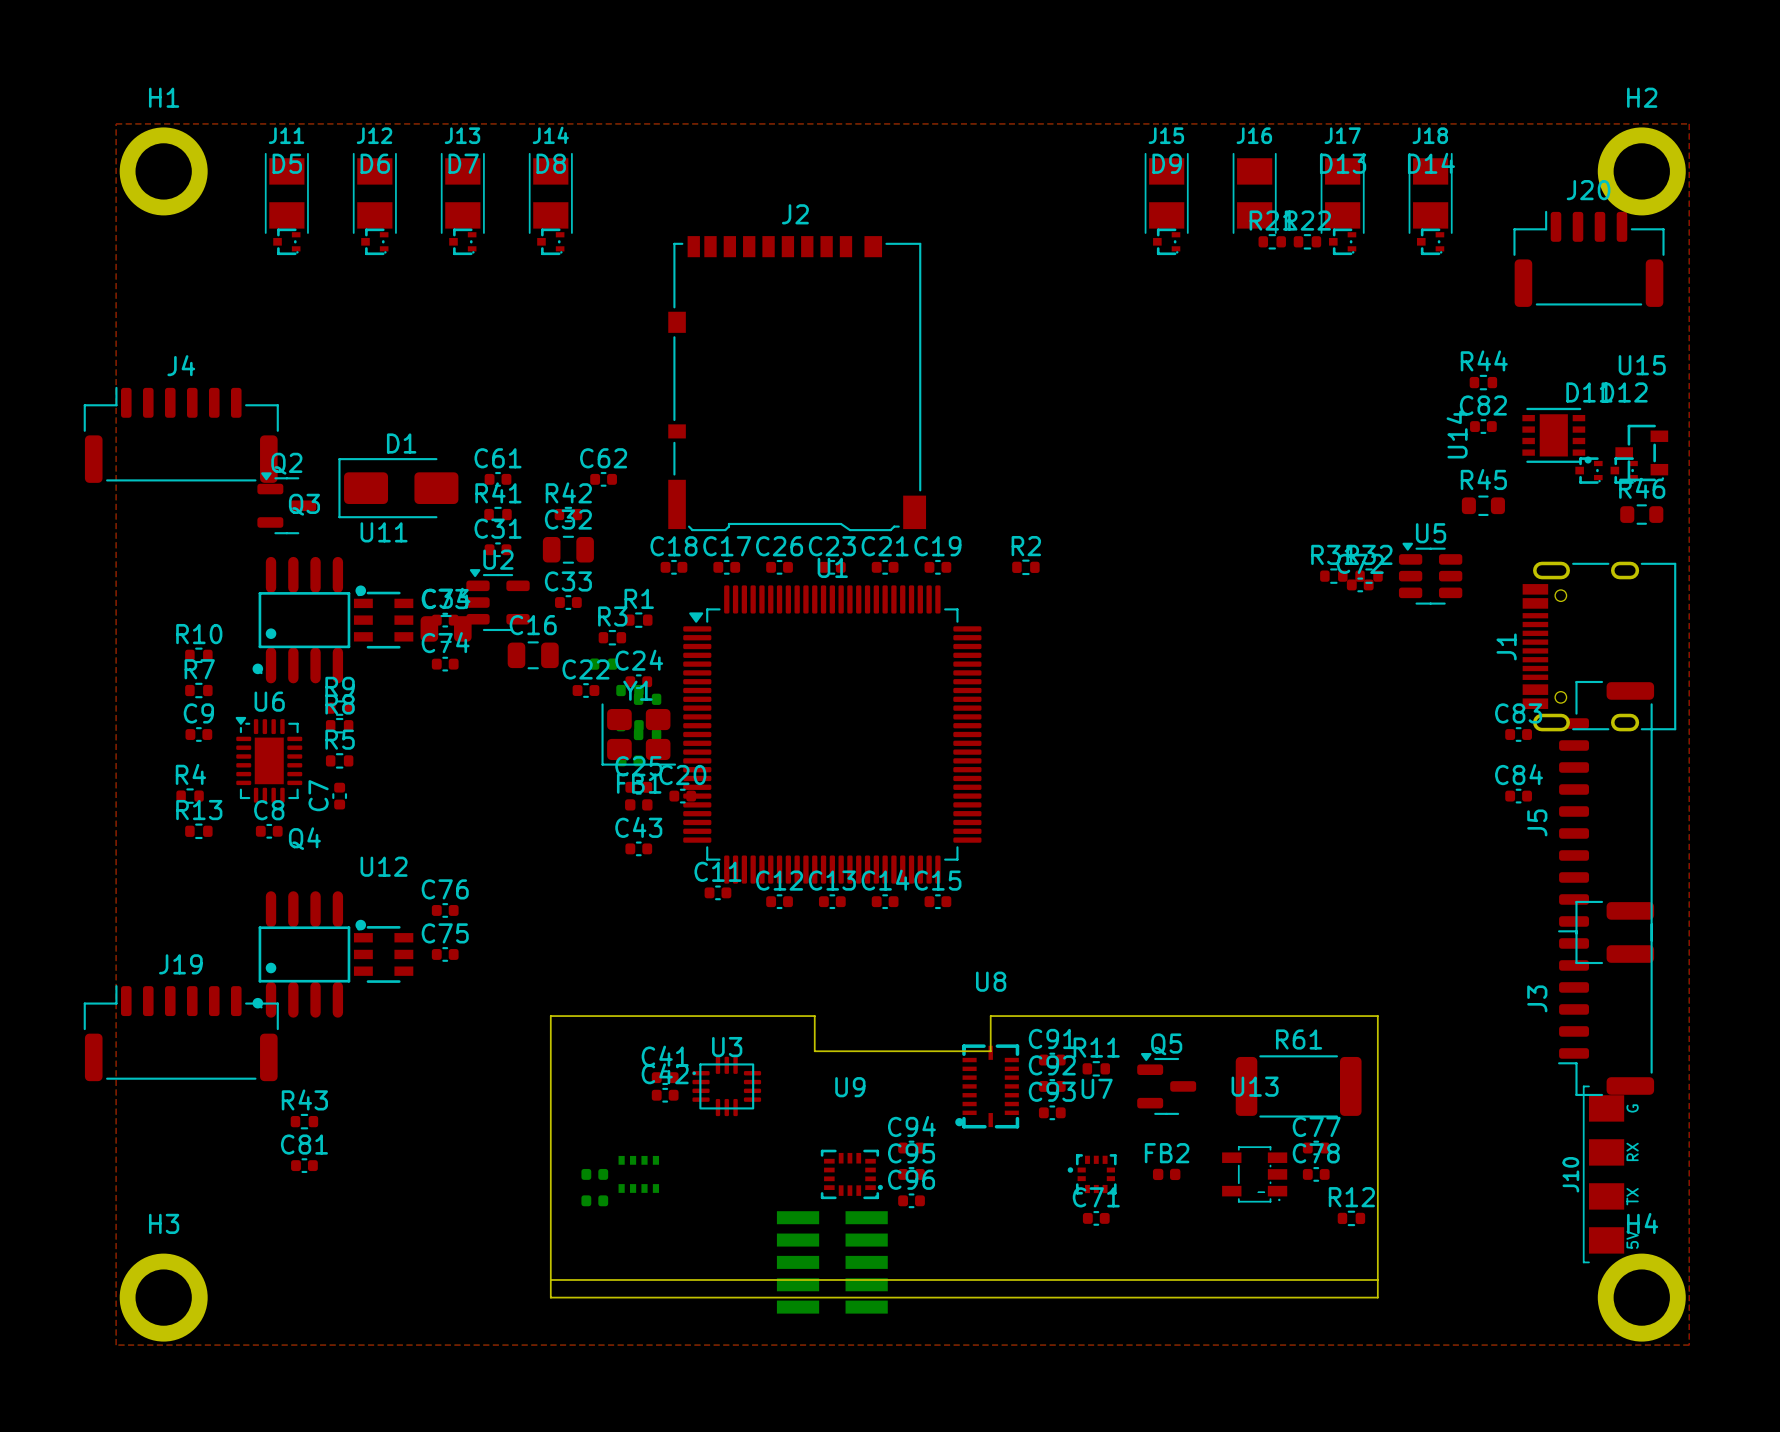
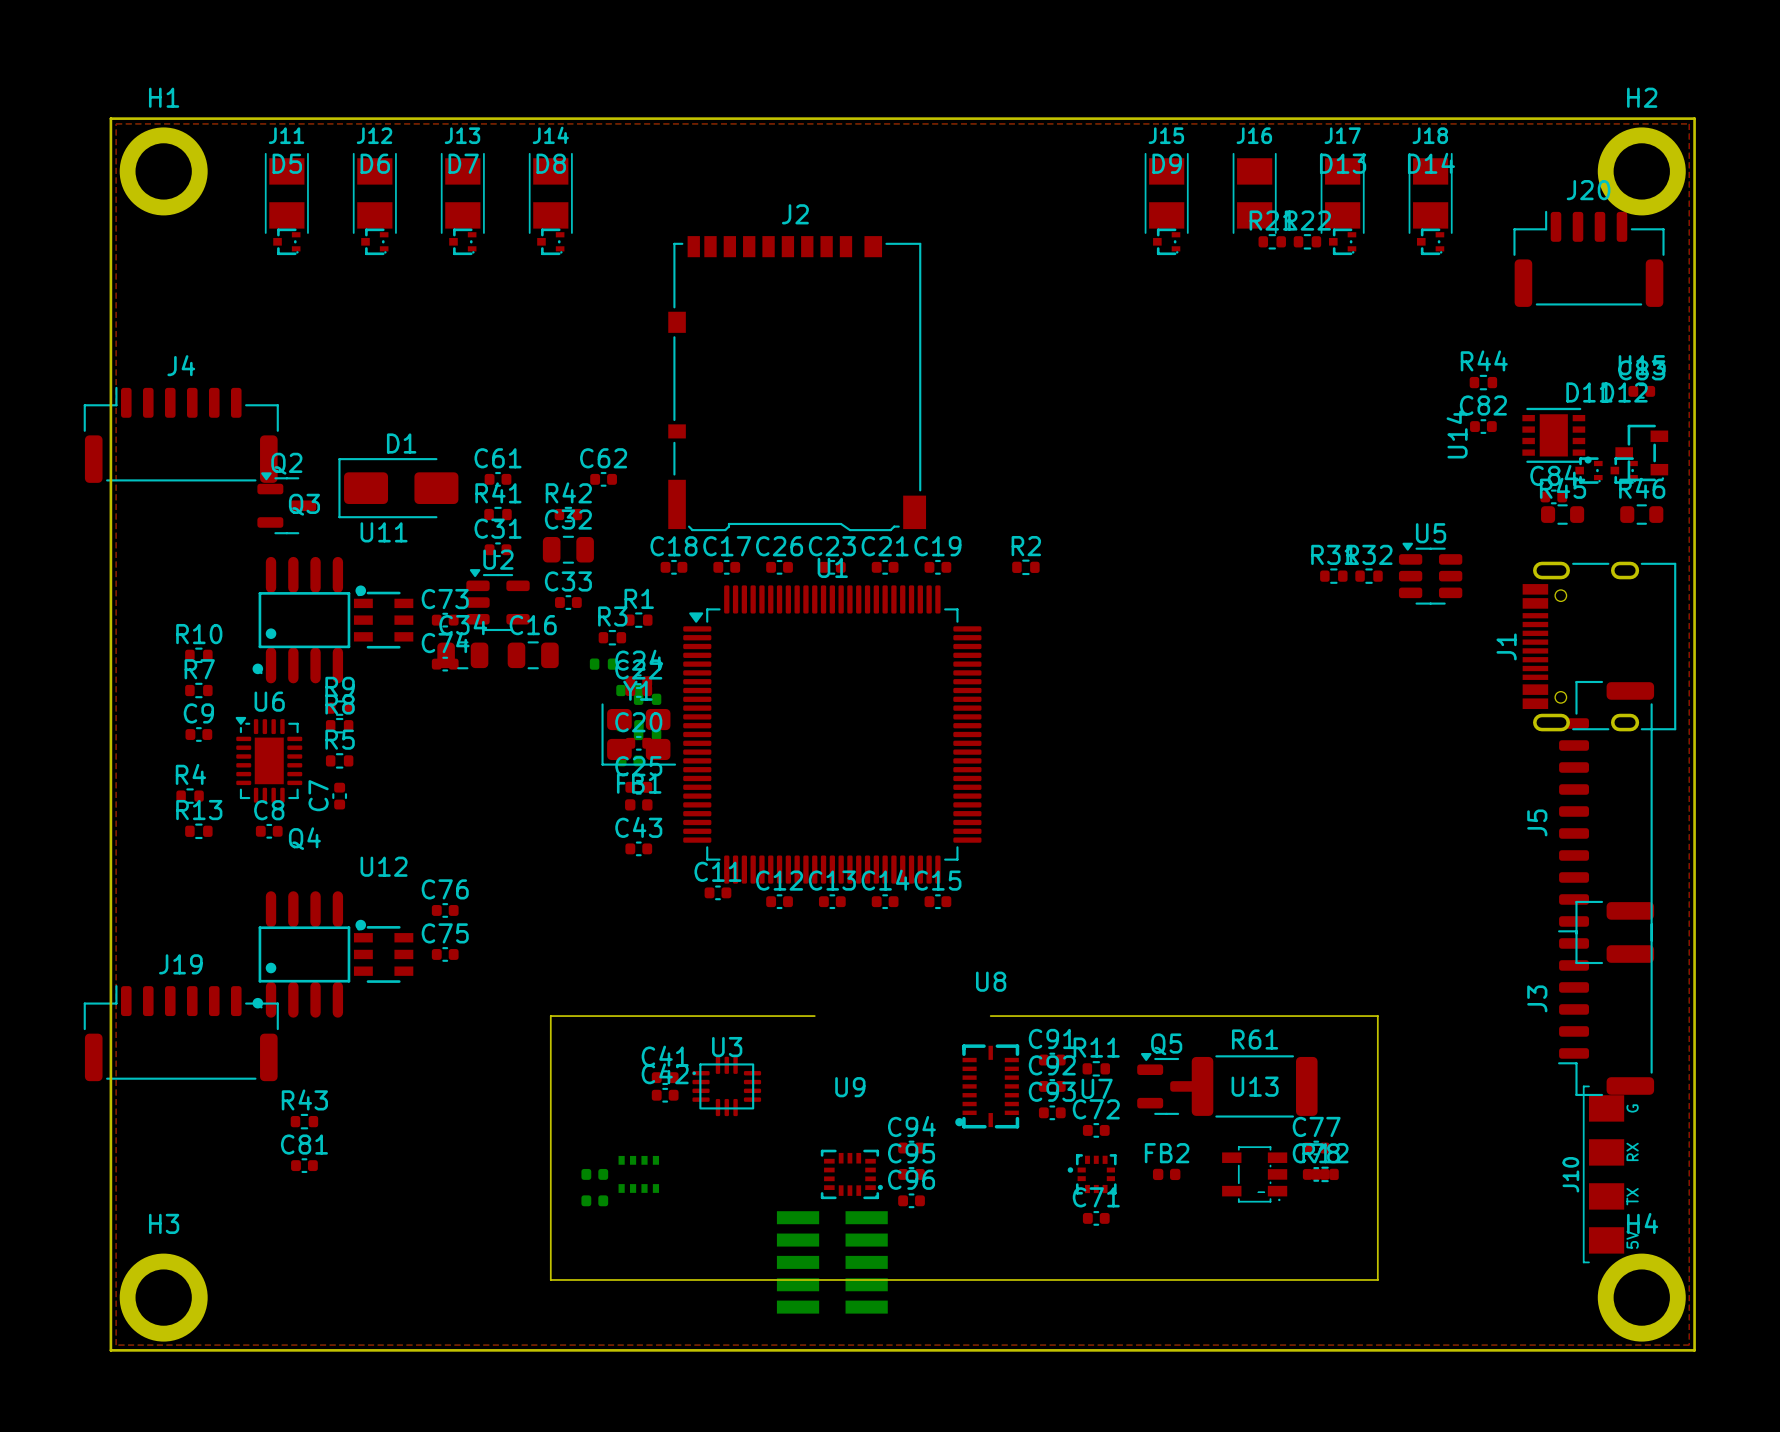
board edge: none -> (110, 118) (1694, 118) (1694, 1350) (110, 1350) (110, 118)
R45 position: (1483, 505) -> (1562, 514)
C72 position: (1360, 584) -> (1096, 1130)
C34 position: (446, 628) -> (462, 655)
C22 position: (585, 690) -> (638, 690)
C83 position: (1518, 734) -> (1641, 391)
C20 position: (682, 796) -> (638, 743)
C84 position: (1518, 796) -> (1553, 496)
board edge: (814, 1016) (814, 1051) (990, 1051) (990, 1016) -> none
R61 position: (1298, 1086) -> (1254, 1086)
R12 position: (1351, 1218) -> (1325, 1174)
board edge: (550, 1279) (550, 1297) (1377, 1297) (1377, 1279) -> none

